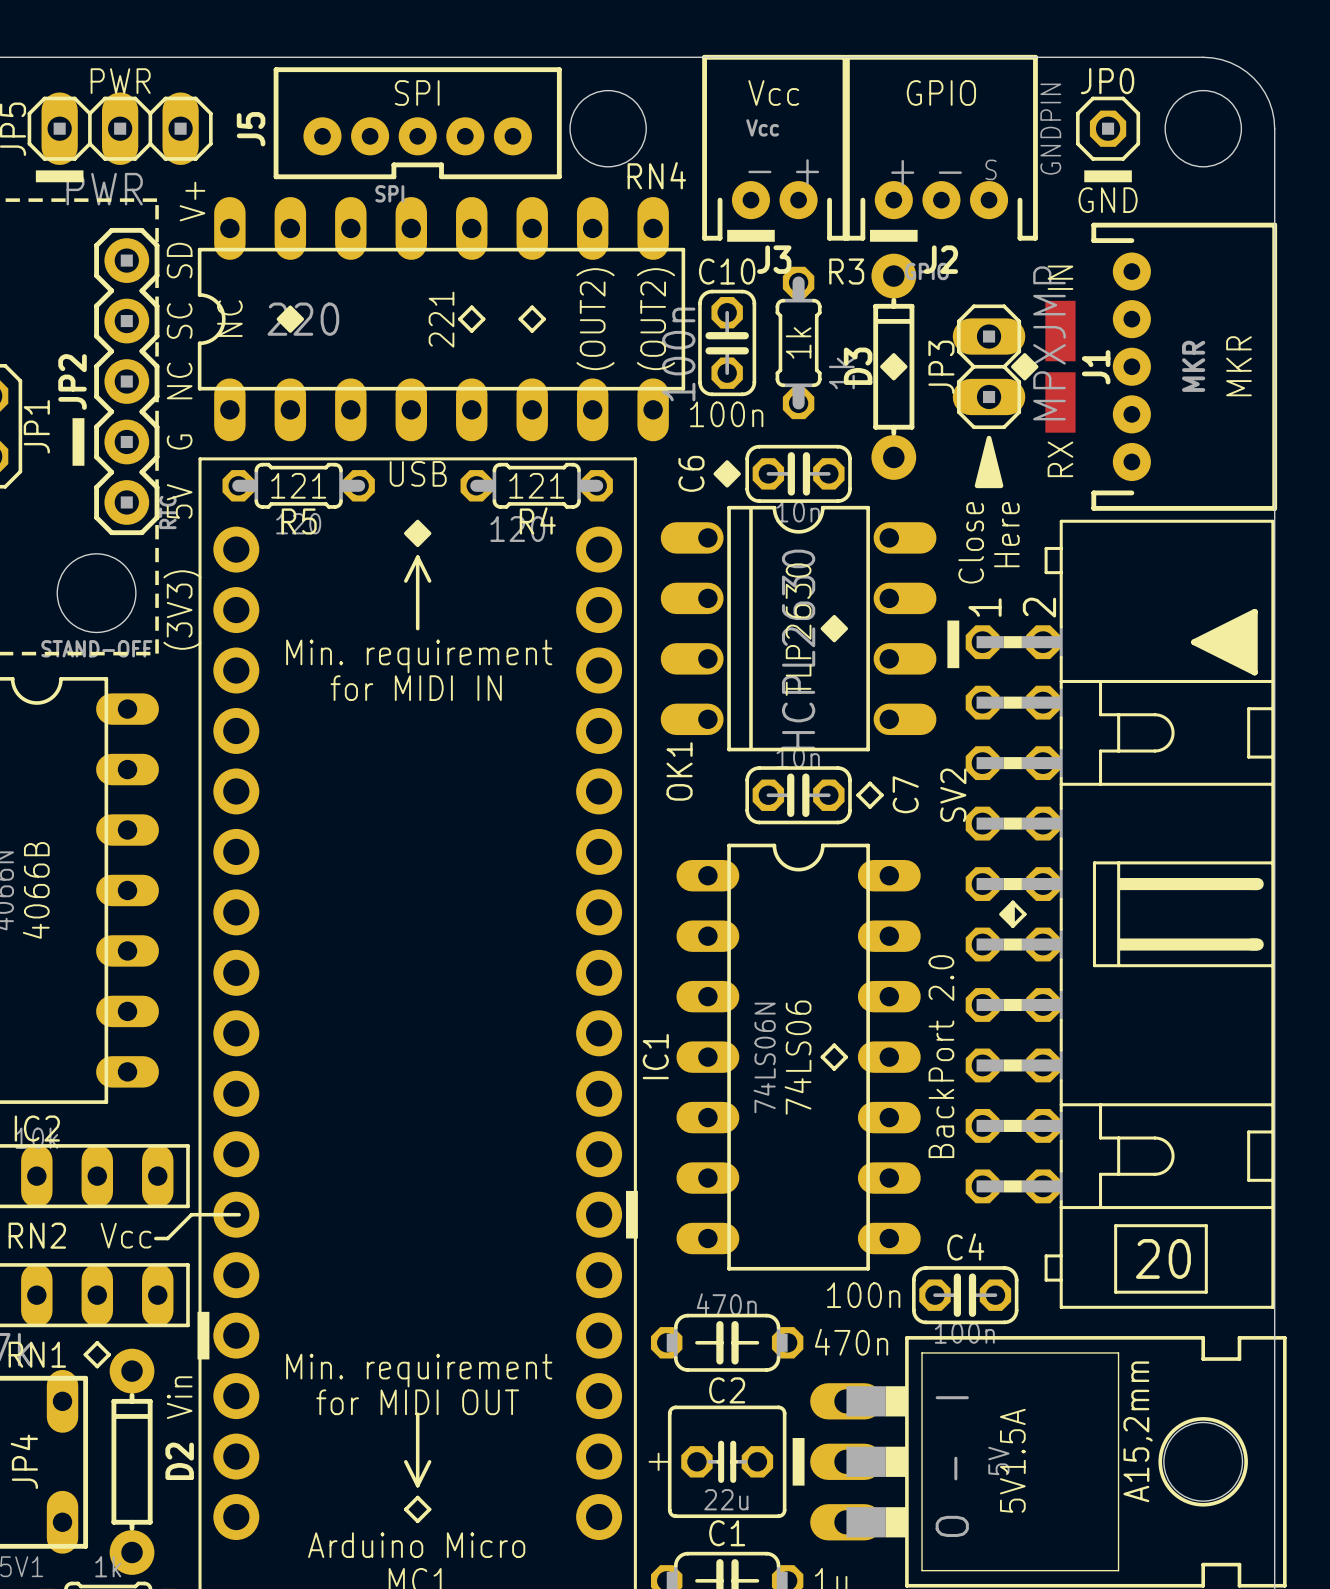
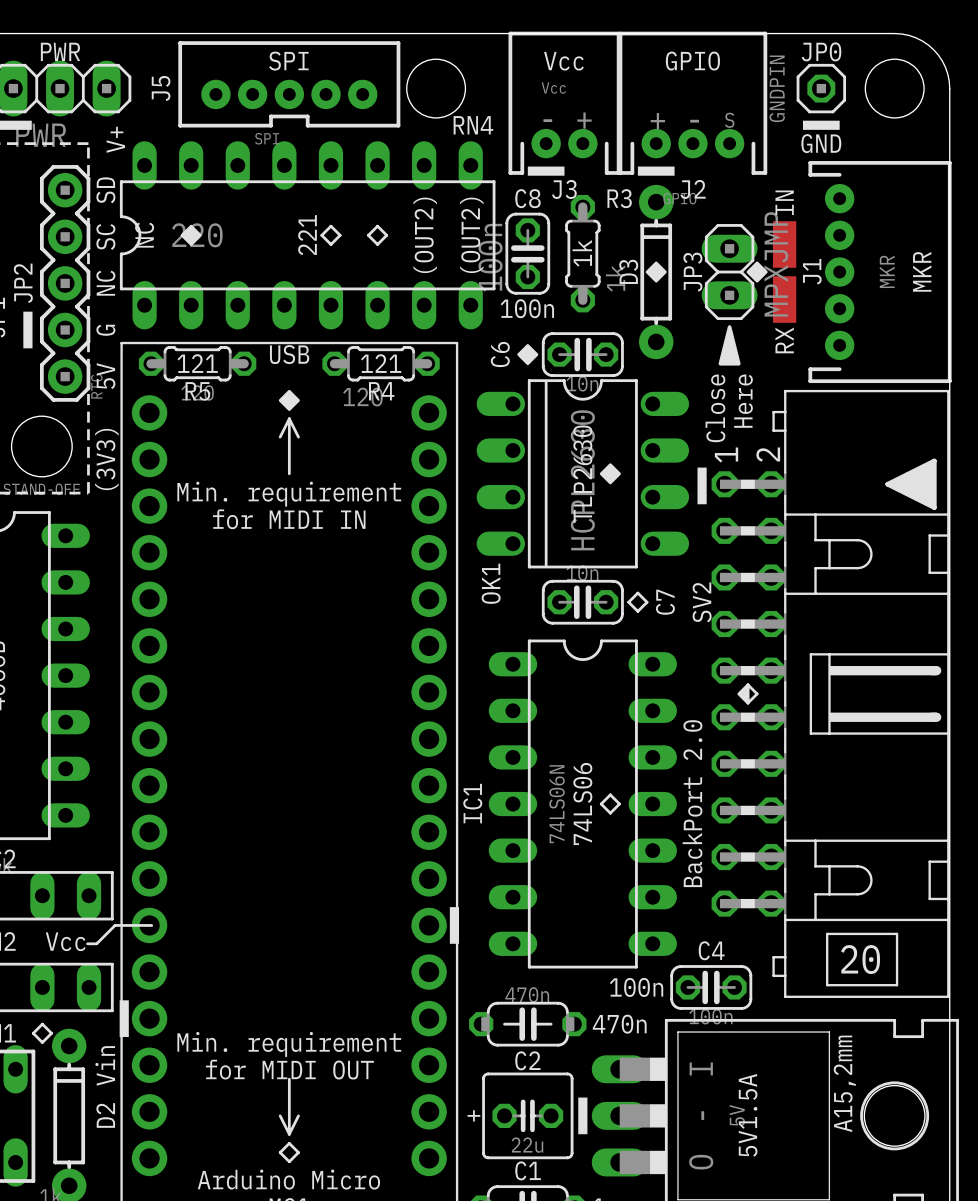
C10 name: C10 (727, 271) -> C8 (527, 198)

